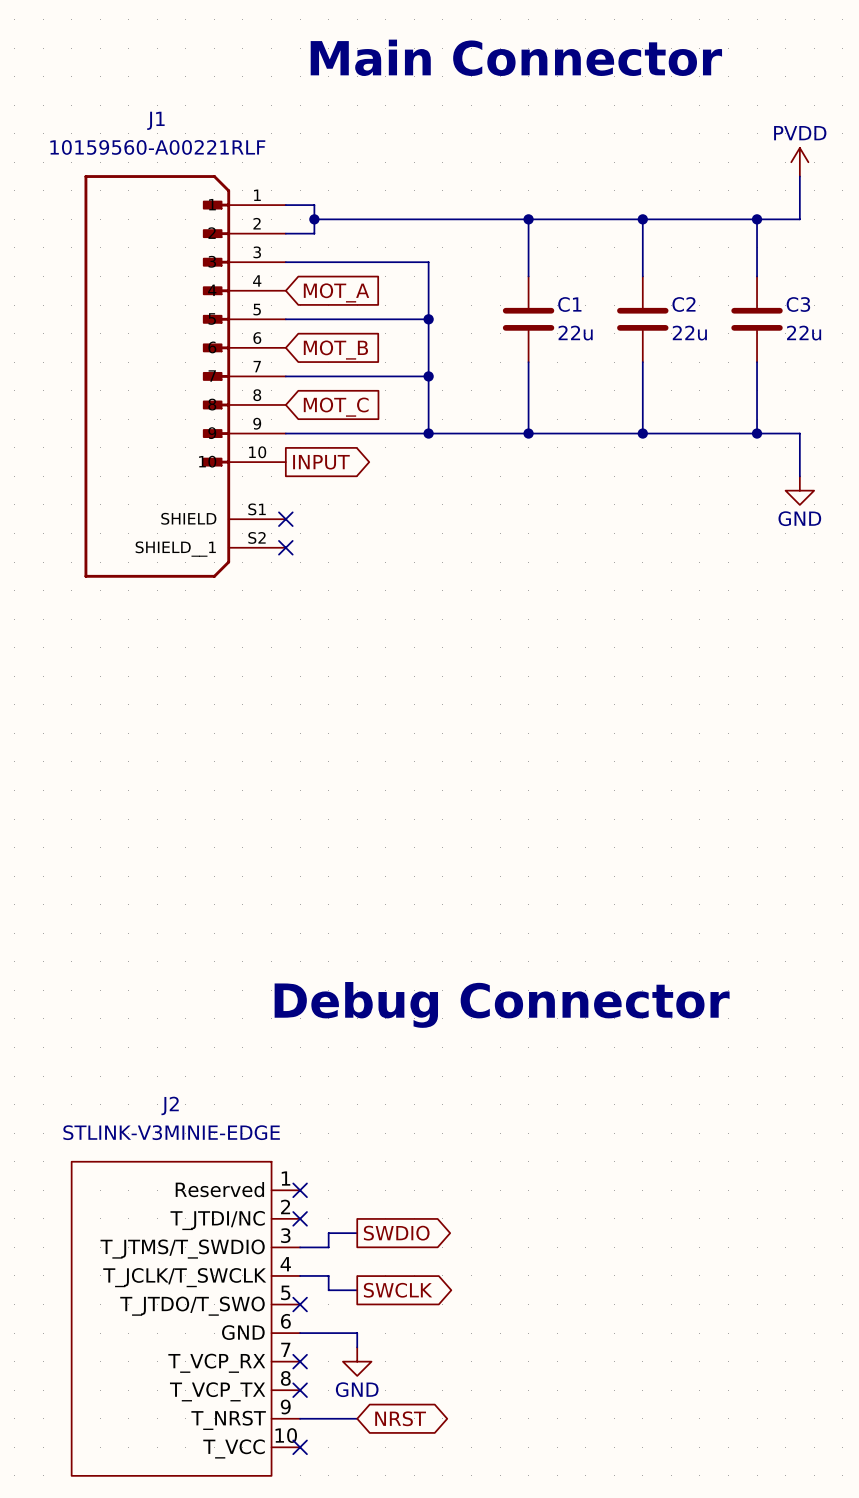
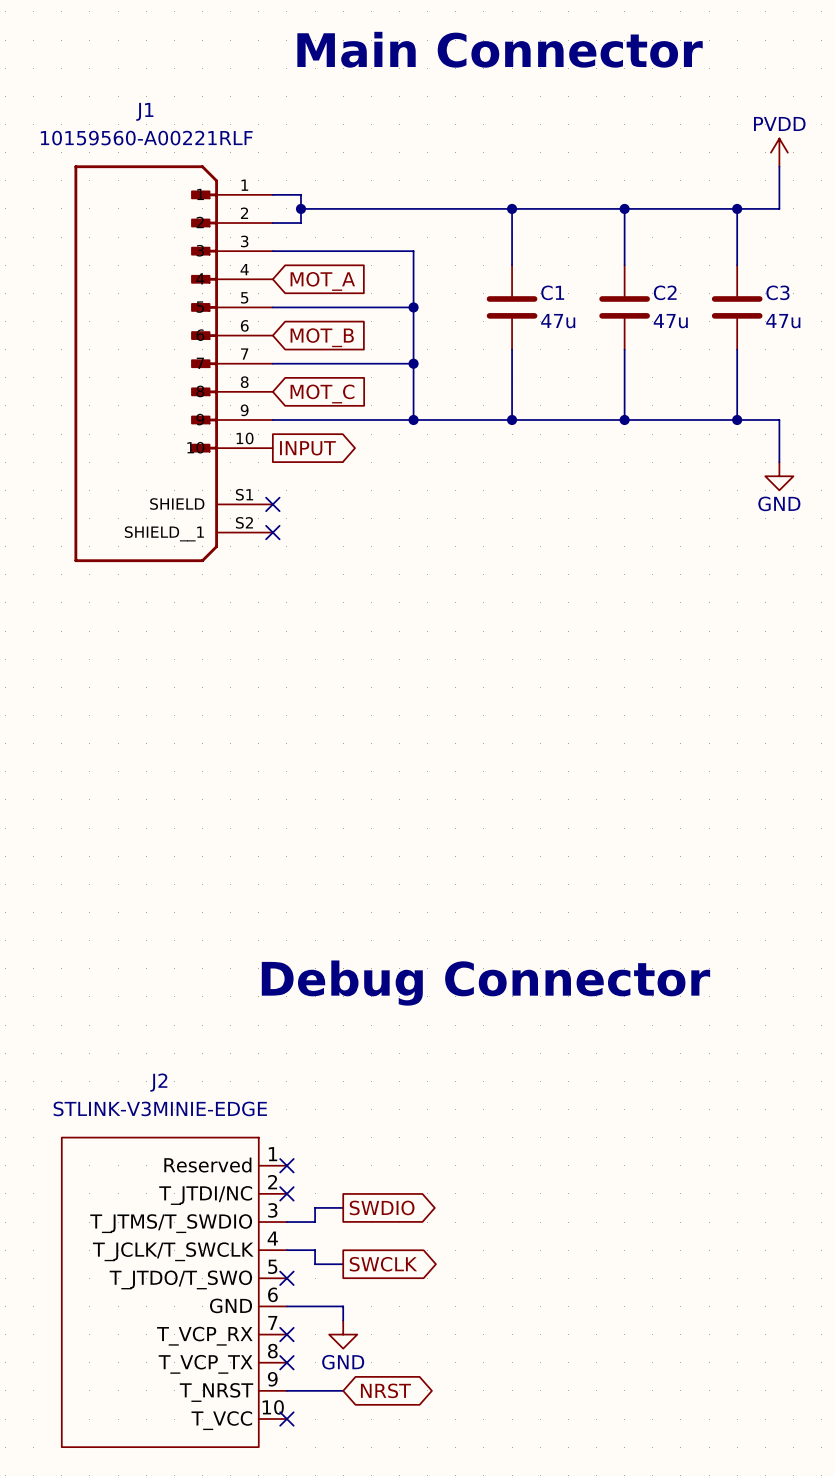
C1 value: 22u (575, 333) -> 47u (558, 321)
C2 value: 22u (689, 333) -> 47u (670, 321)
C3 value: 22u (804, 333) -> 47u (783, 321)

